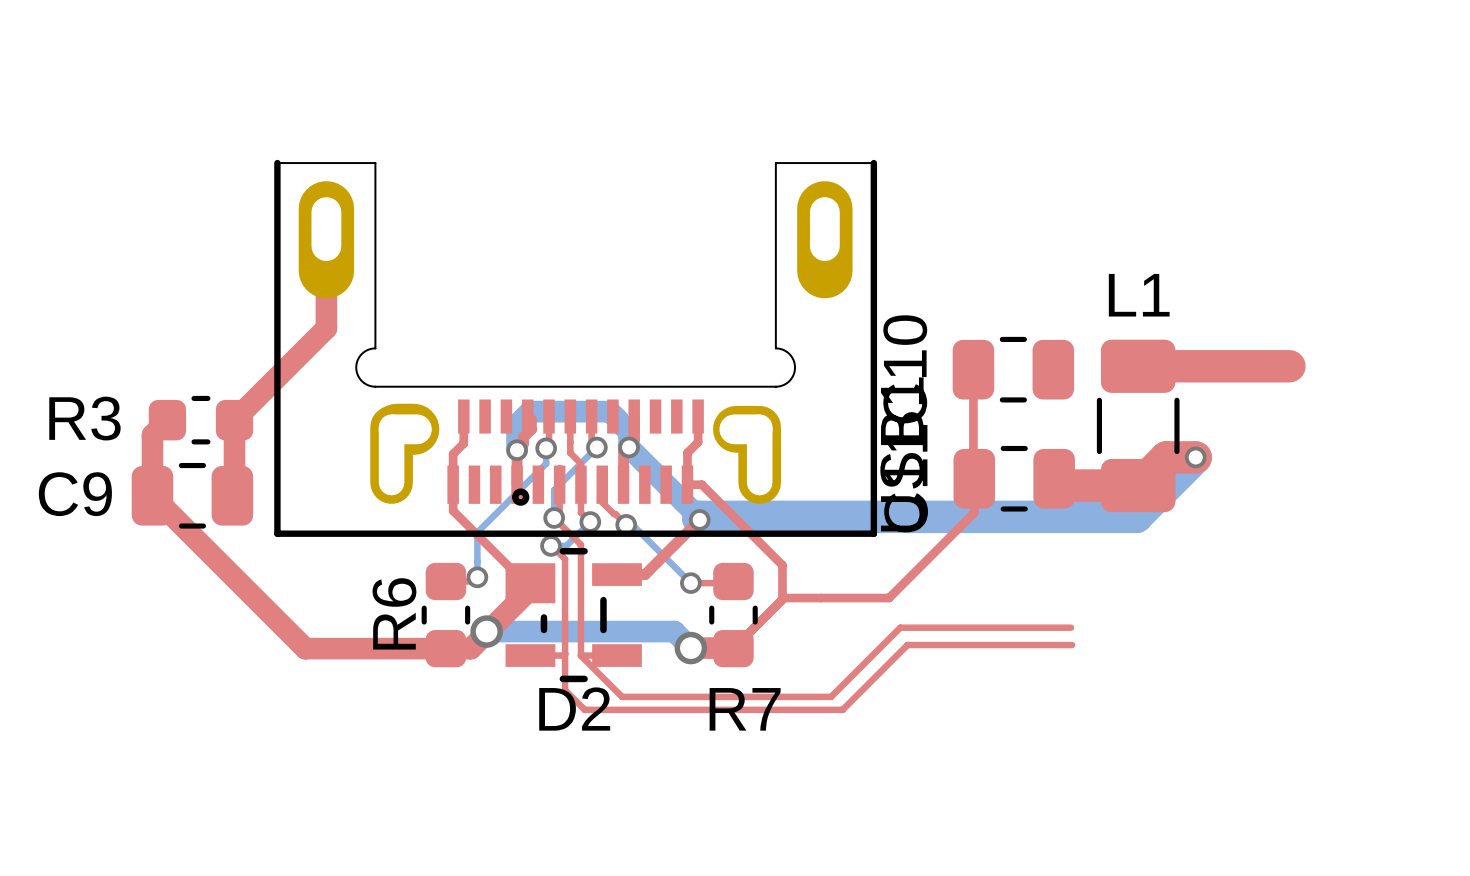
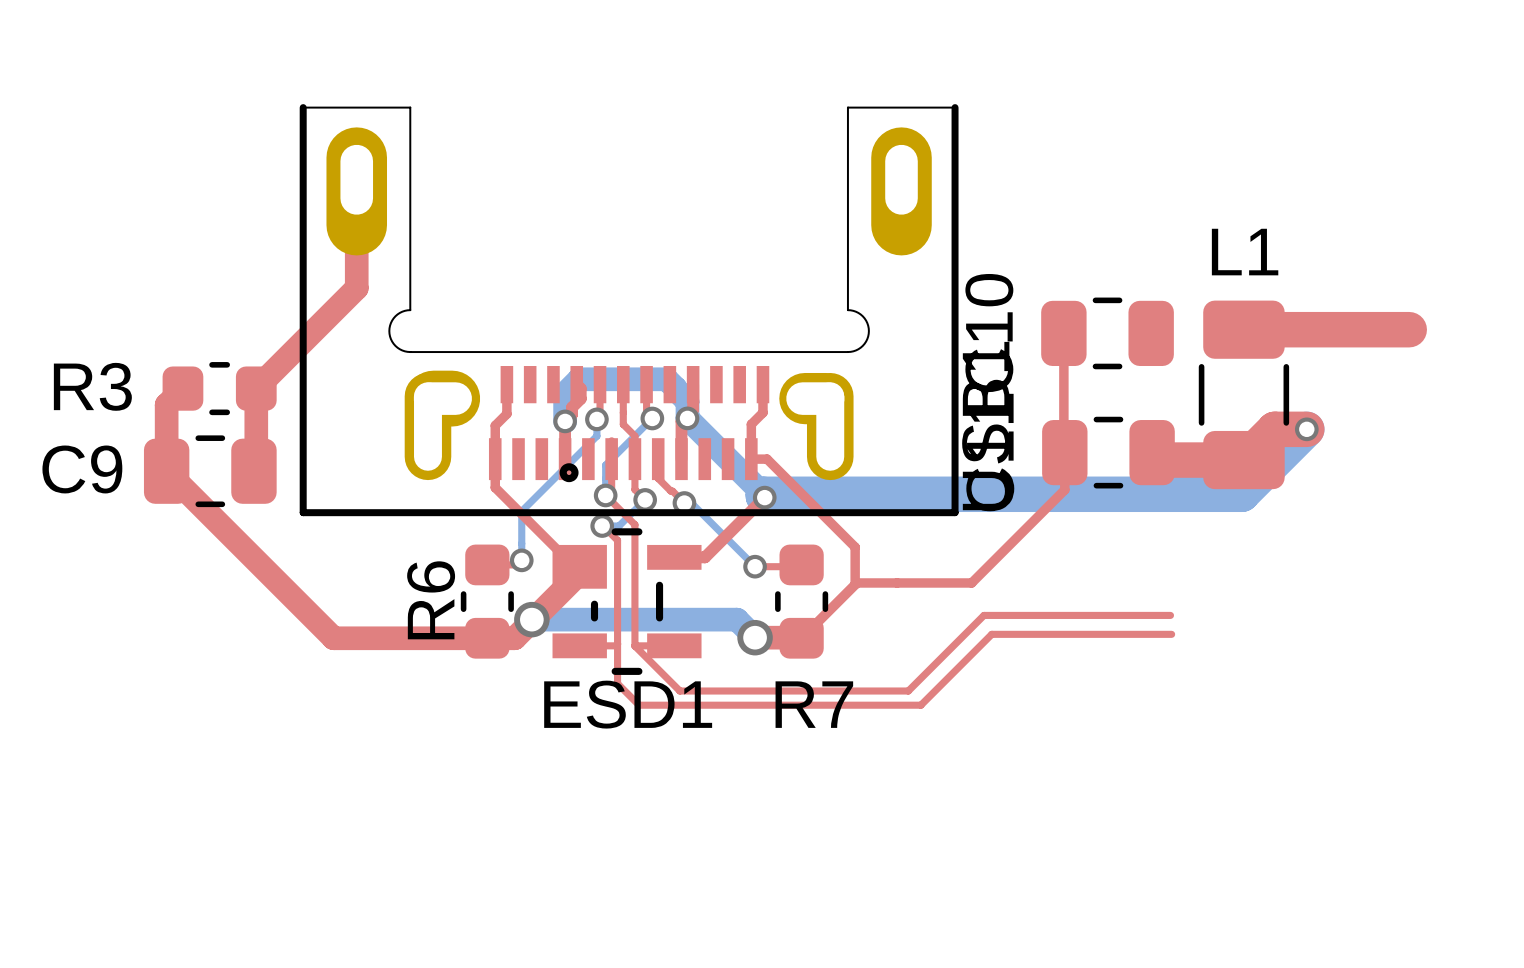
D2 name: D2 (574, 709) -> ESD1 (628, 704)

